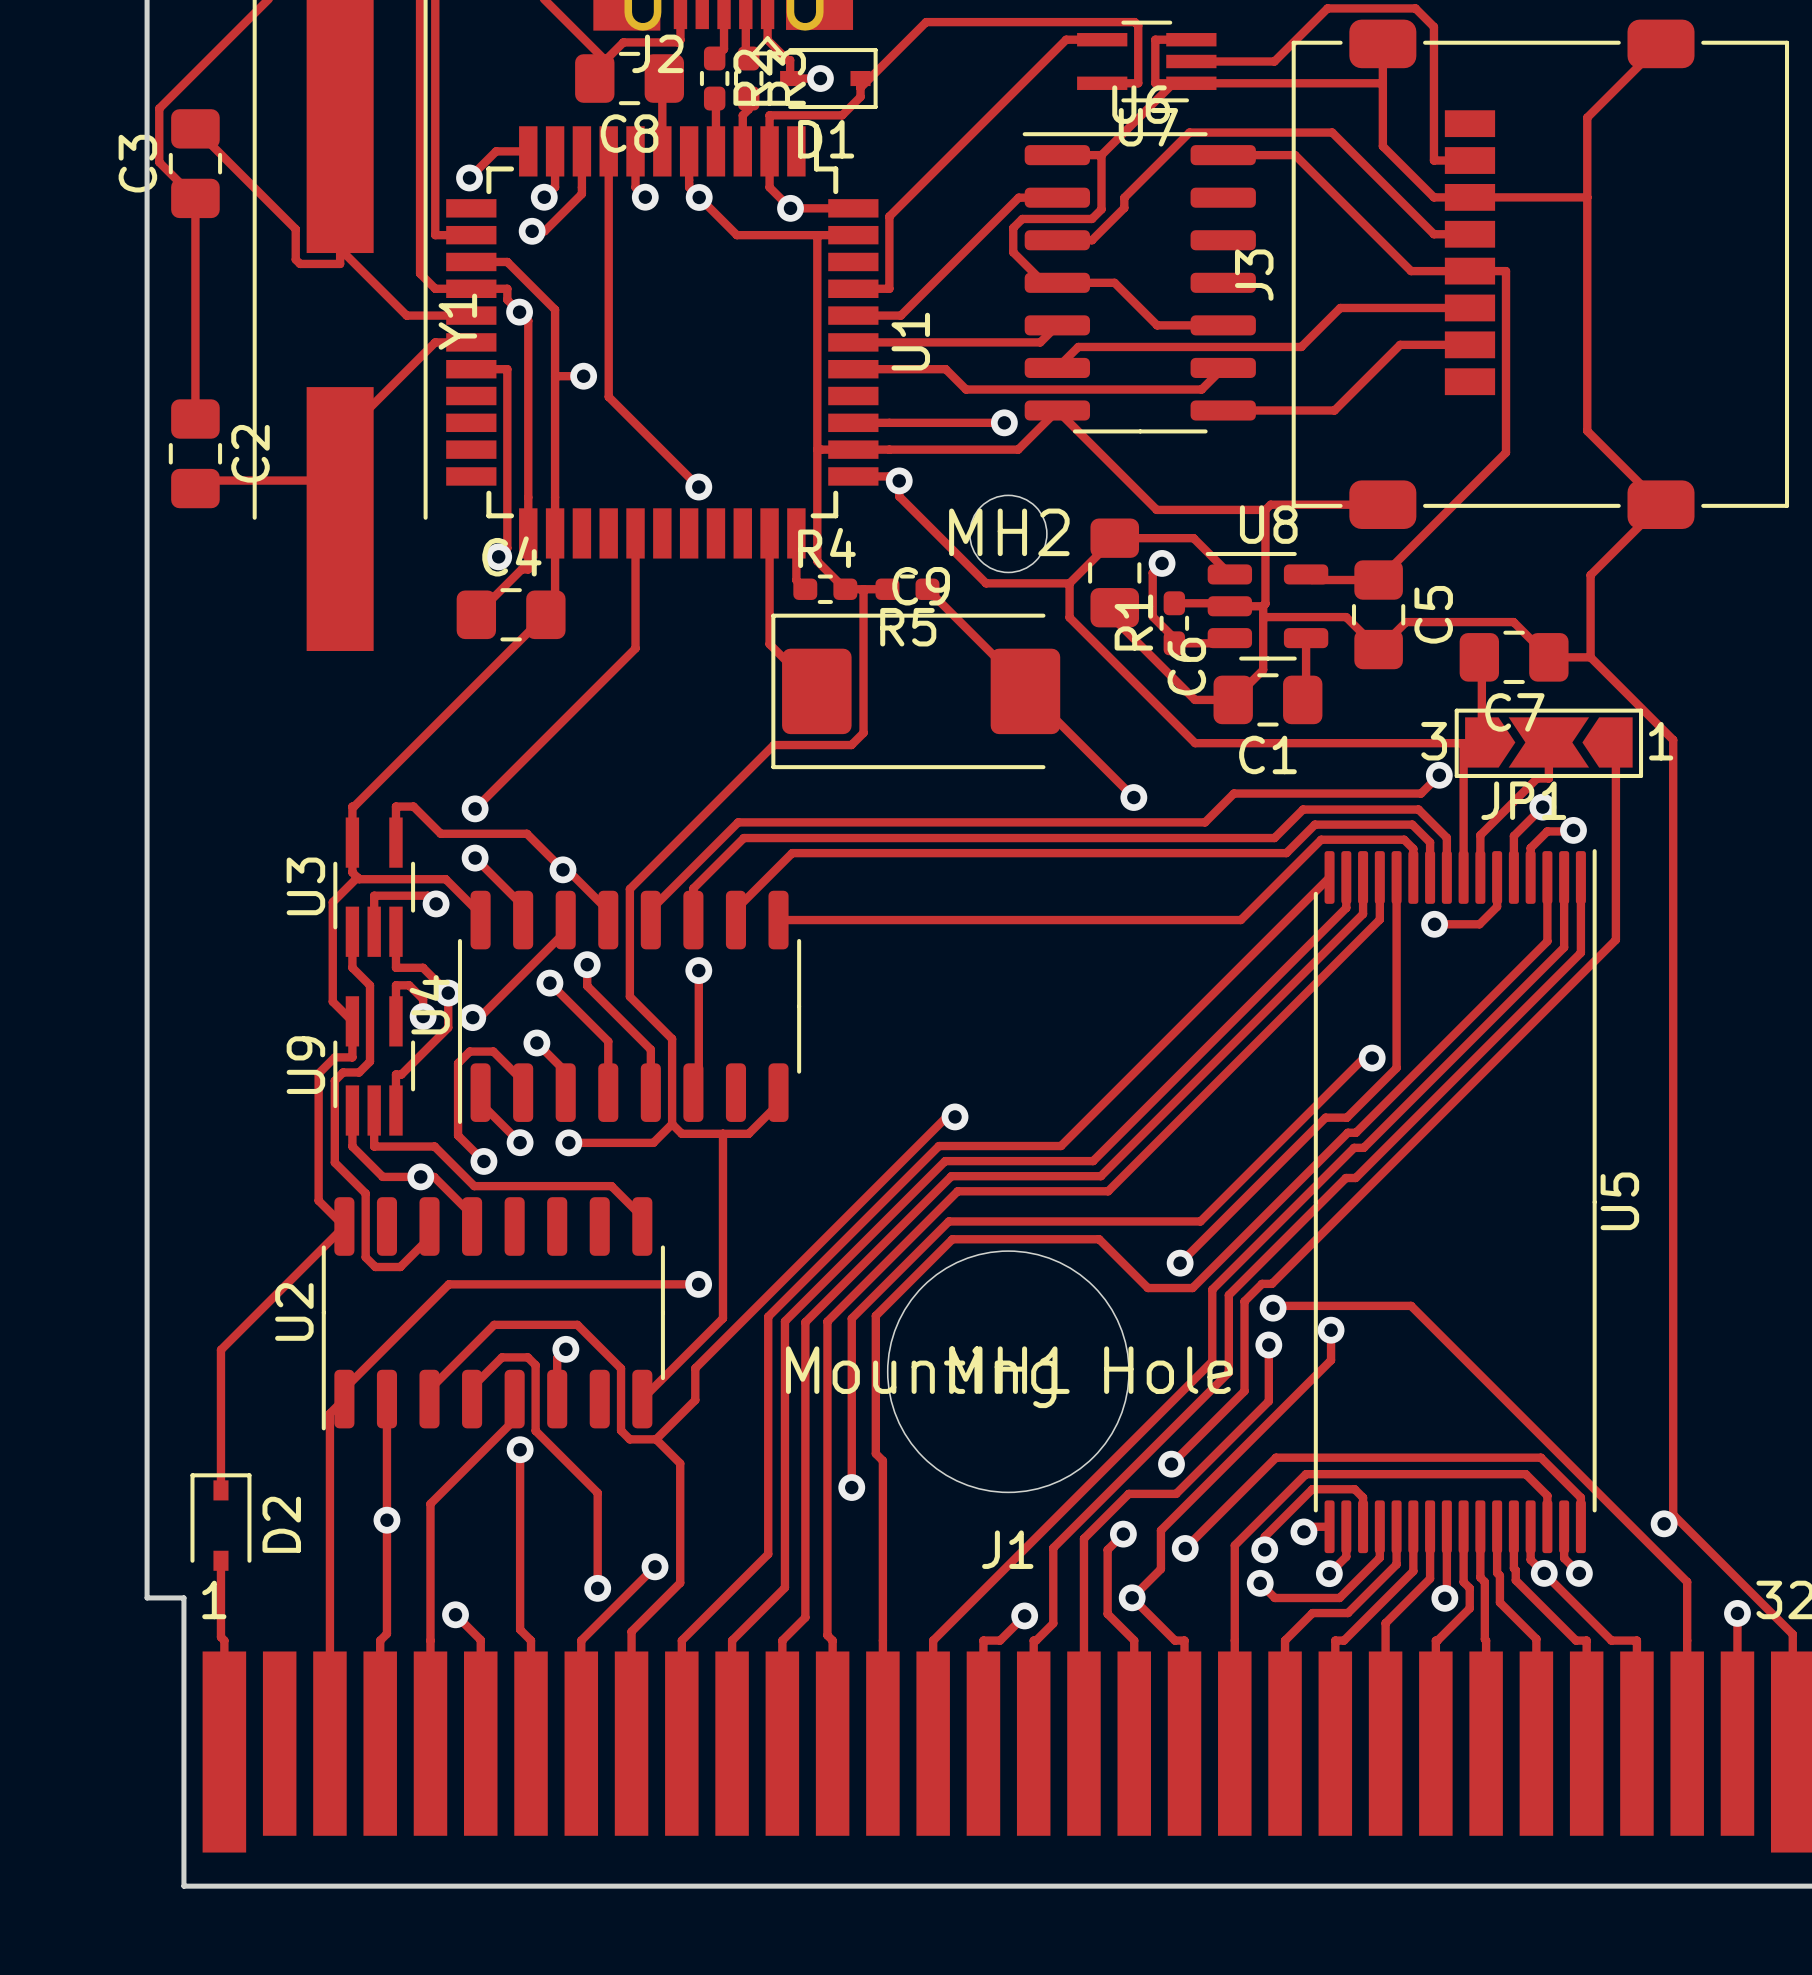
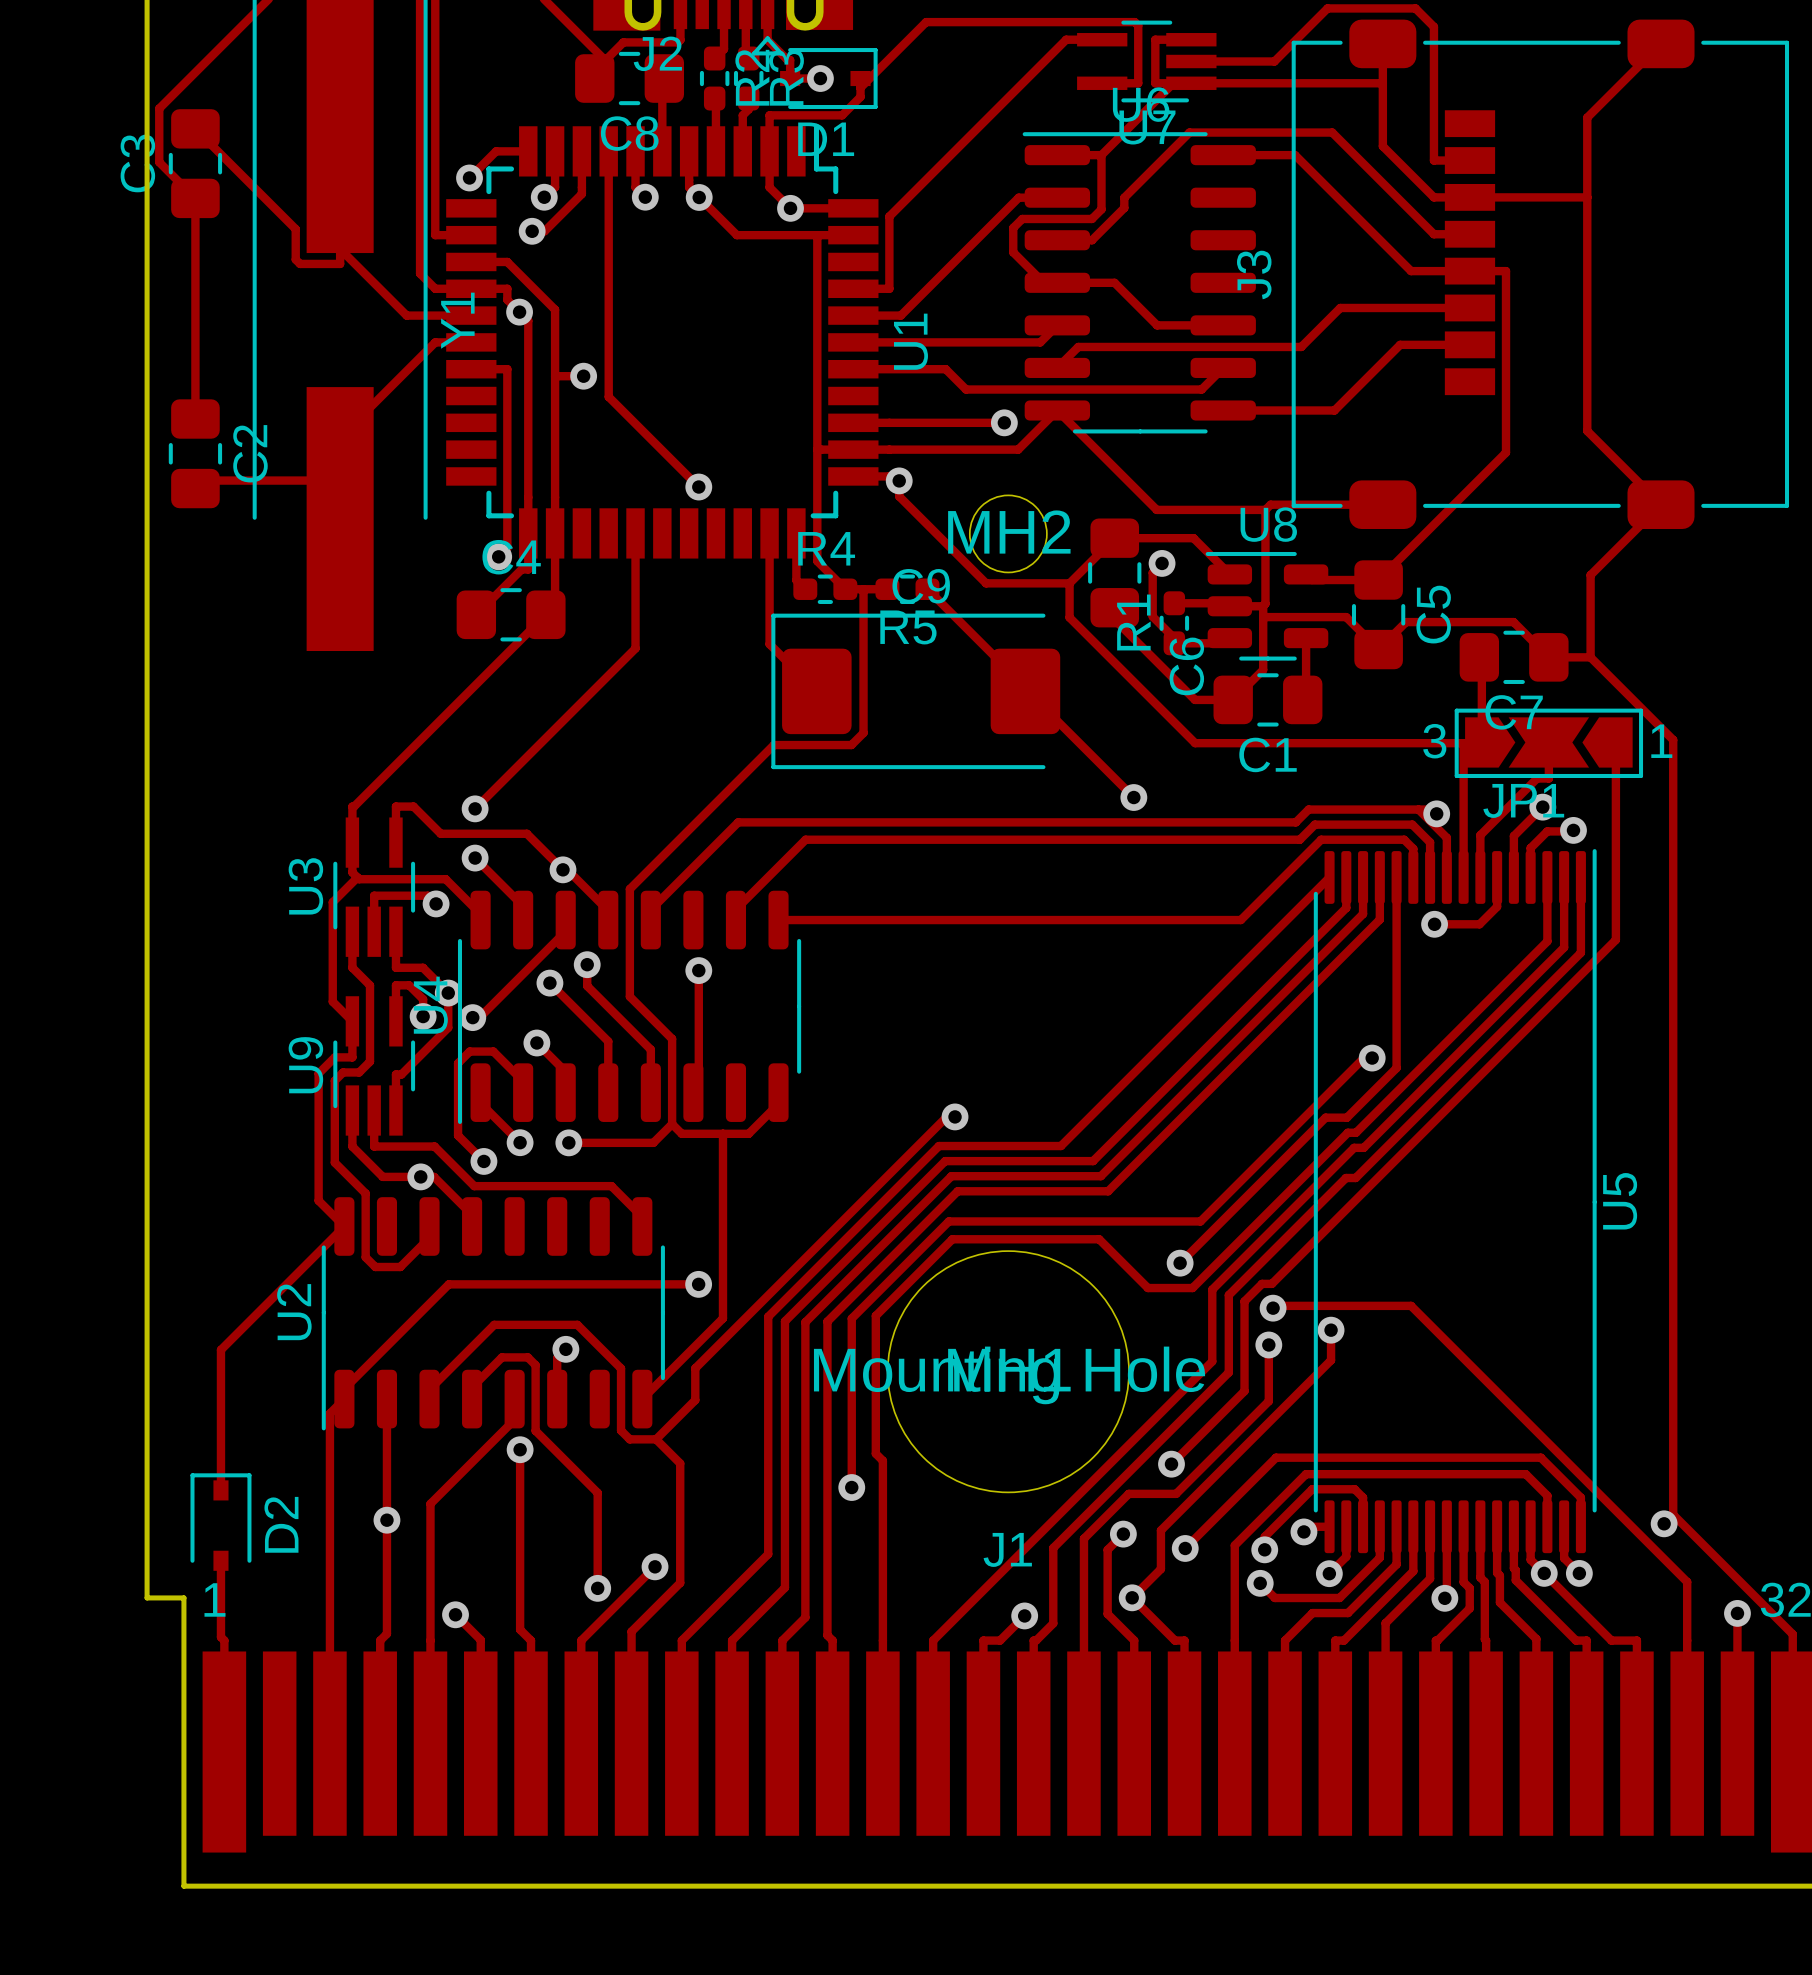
track: (1439, 775) (1421, 793) (1233, 793) (1205, 822) -> (1308, 809) (1295, 822) (1205, 822)
via position: (1439, 775) -> (1436, 813)
track: (1308, 809) (1303, 809) (1274, 838) (743, 838) (693, 888) (693, 920) -> none
track: (1299, 839) (1286, 853) (792, 853) -> (1299, 839) (805, 839) (792, 853)

